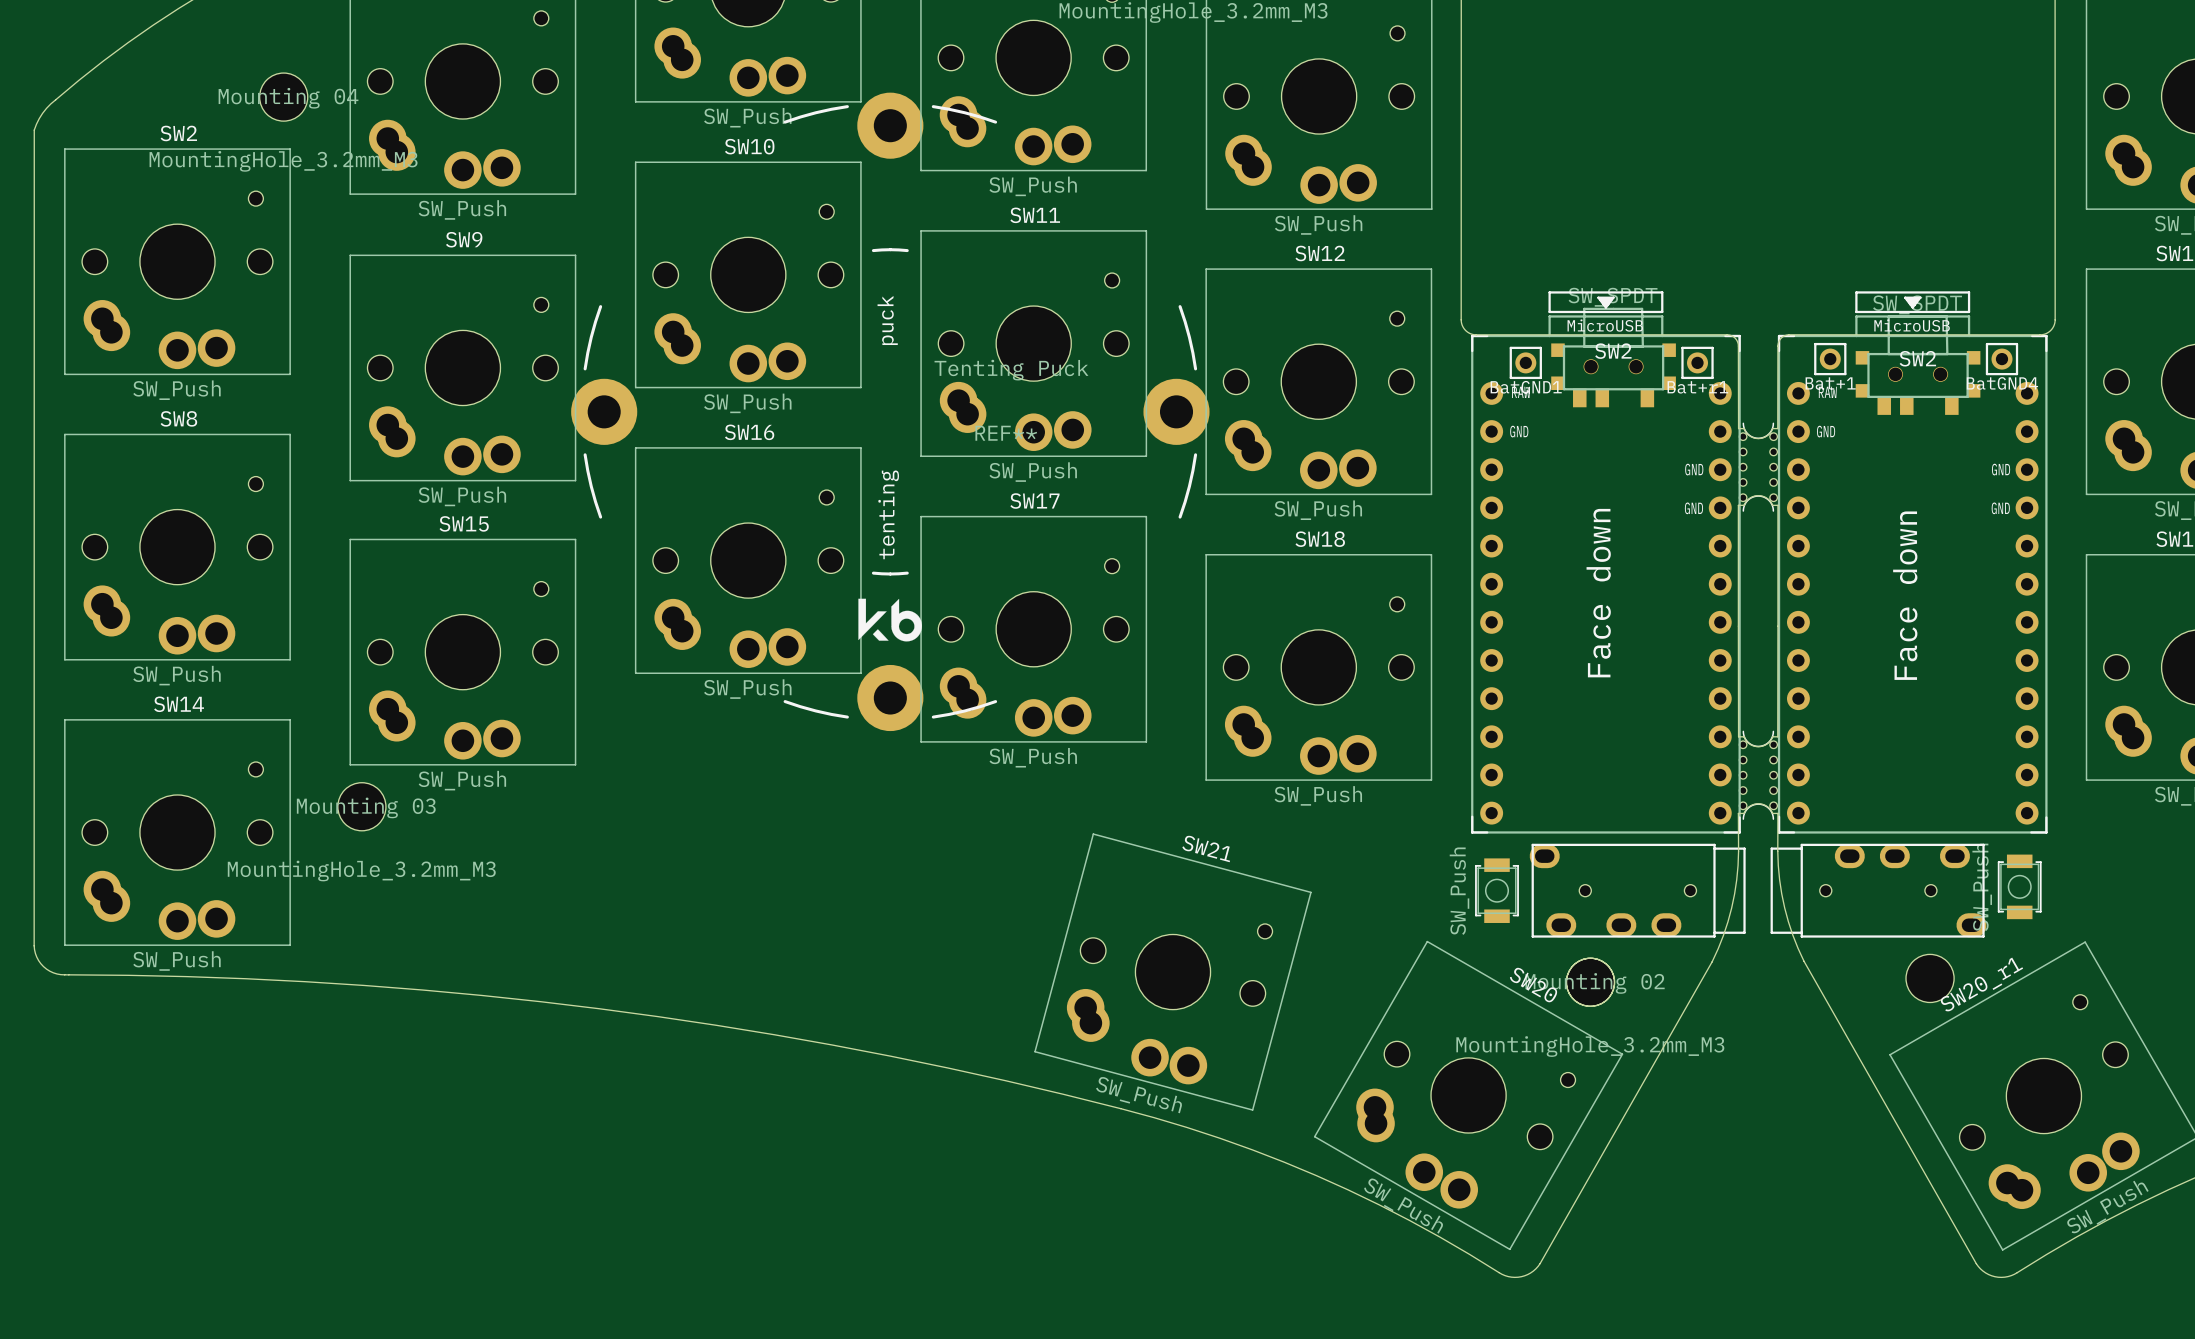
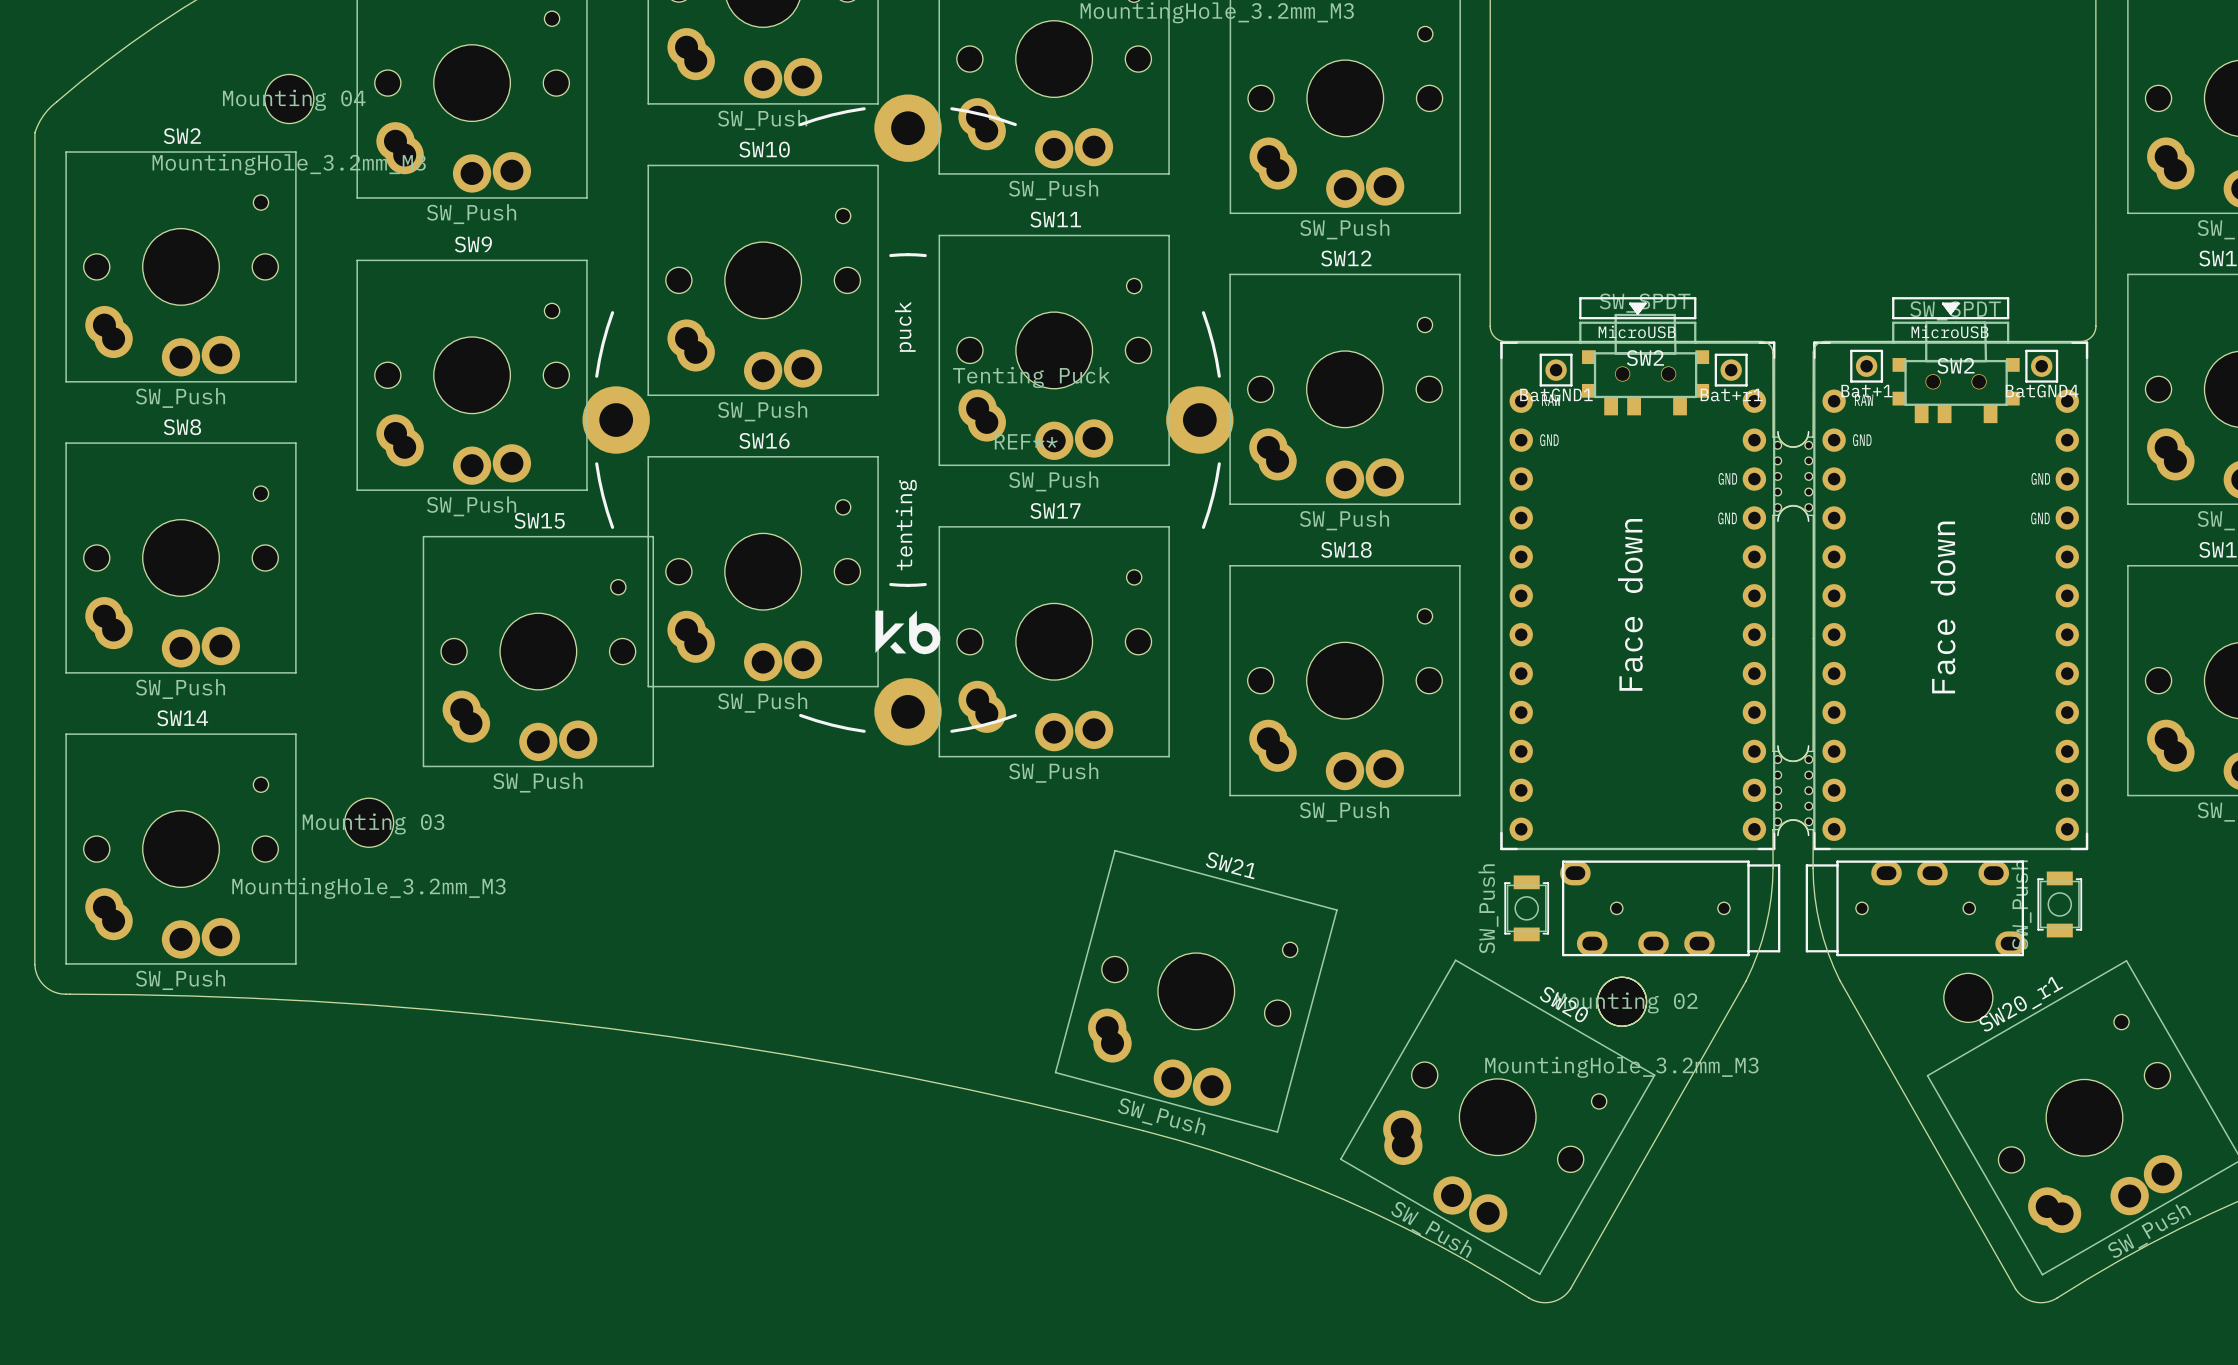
SW15 position: (462, 652) -> (538, 651)

